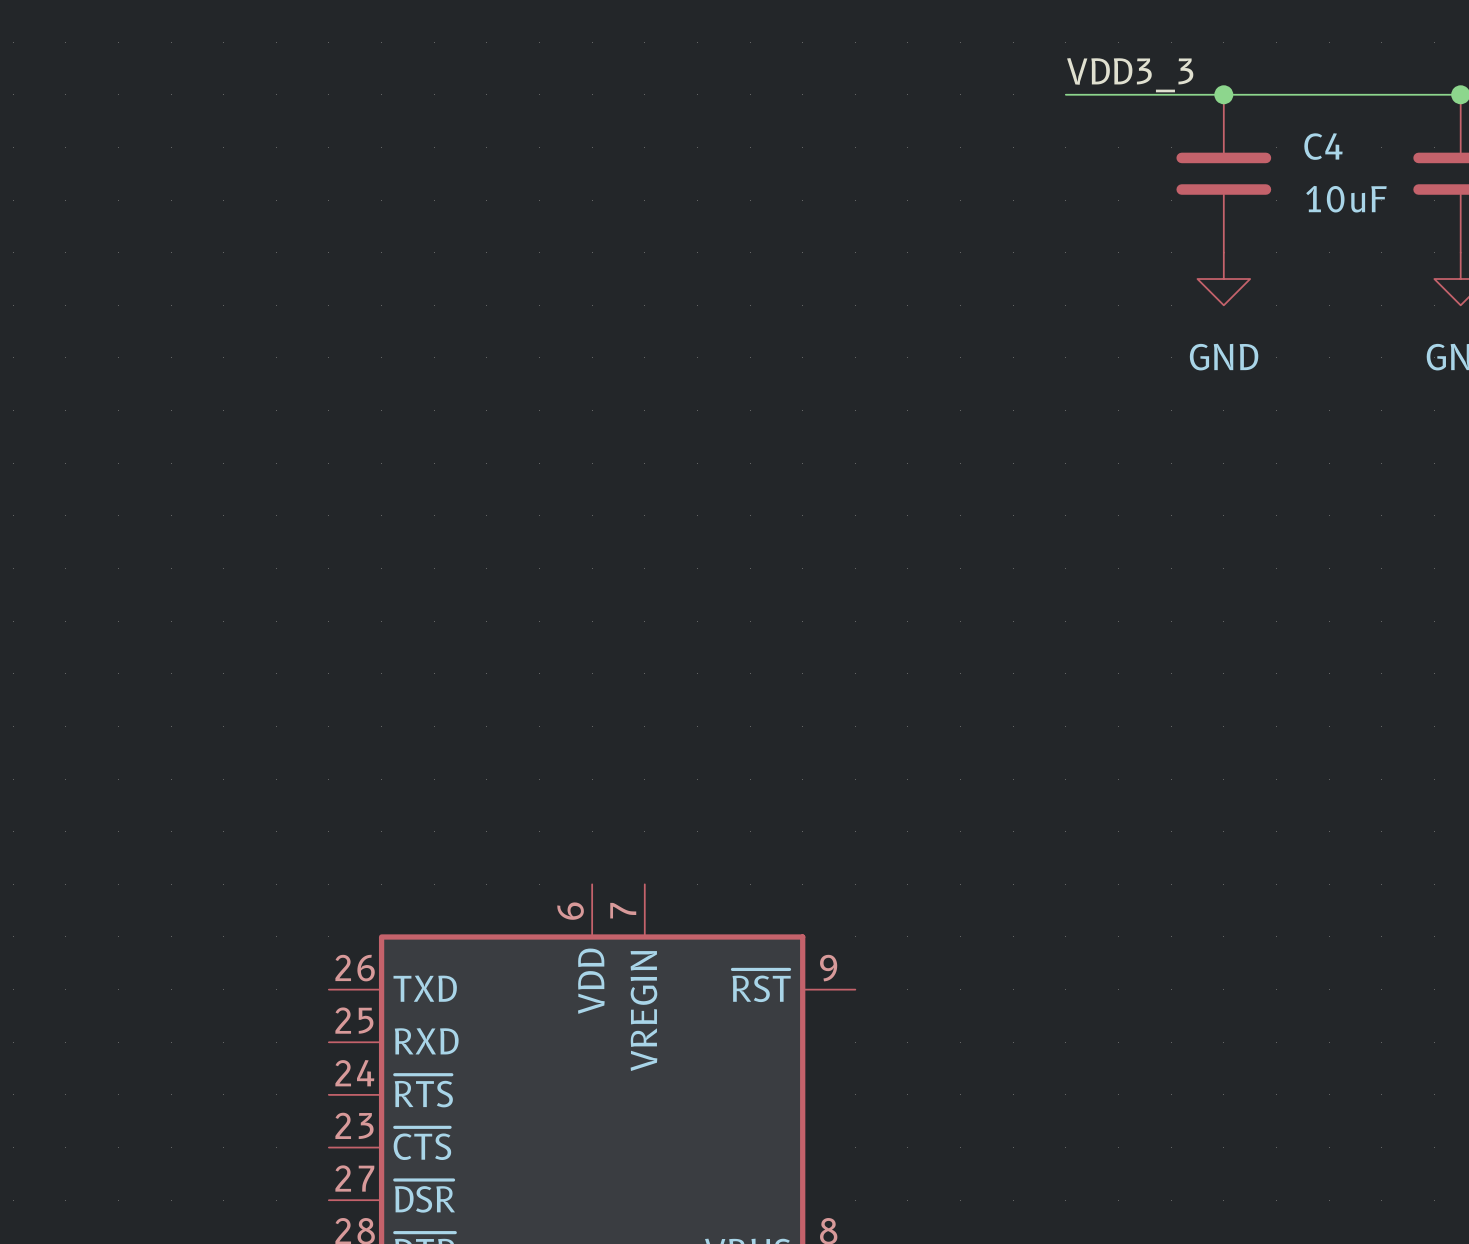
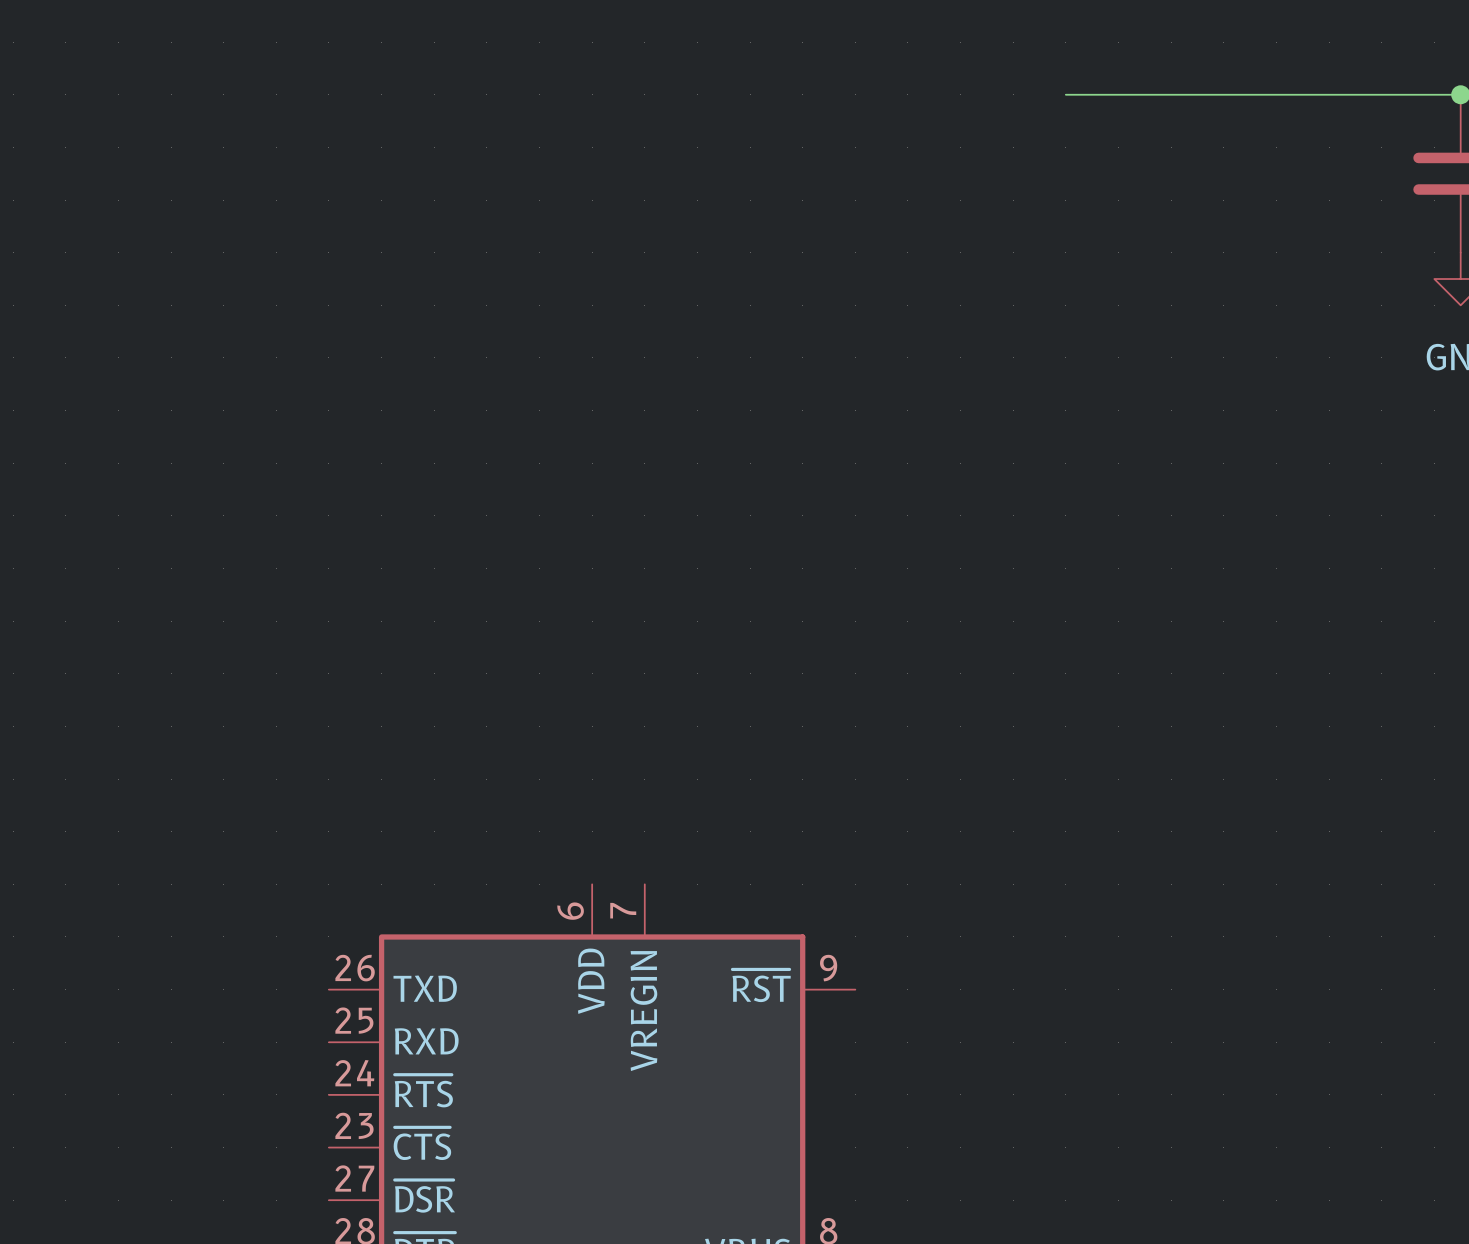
label: VDD3_3 (1130, 75) -> none
junction: (1223, 94) -> none
C4: 10uF (1223, 173) -> none
power symbol: GND (1223, 279) -> none

